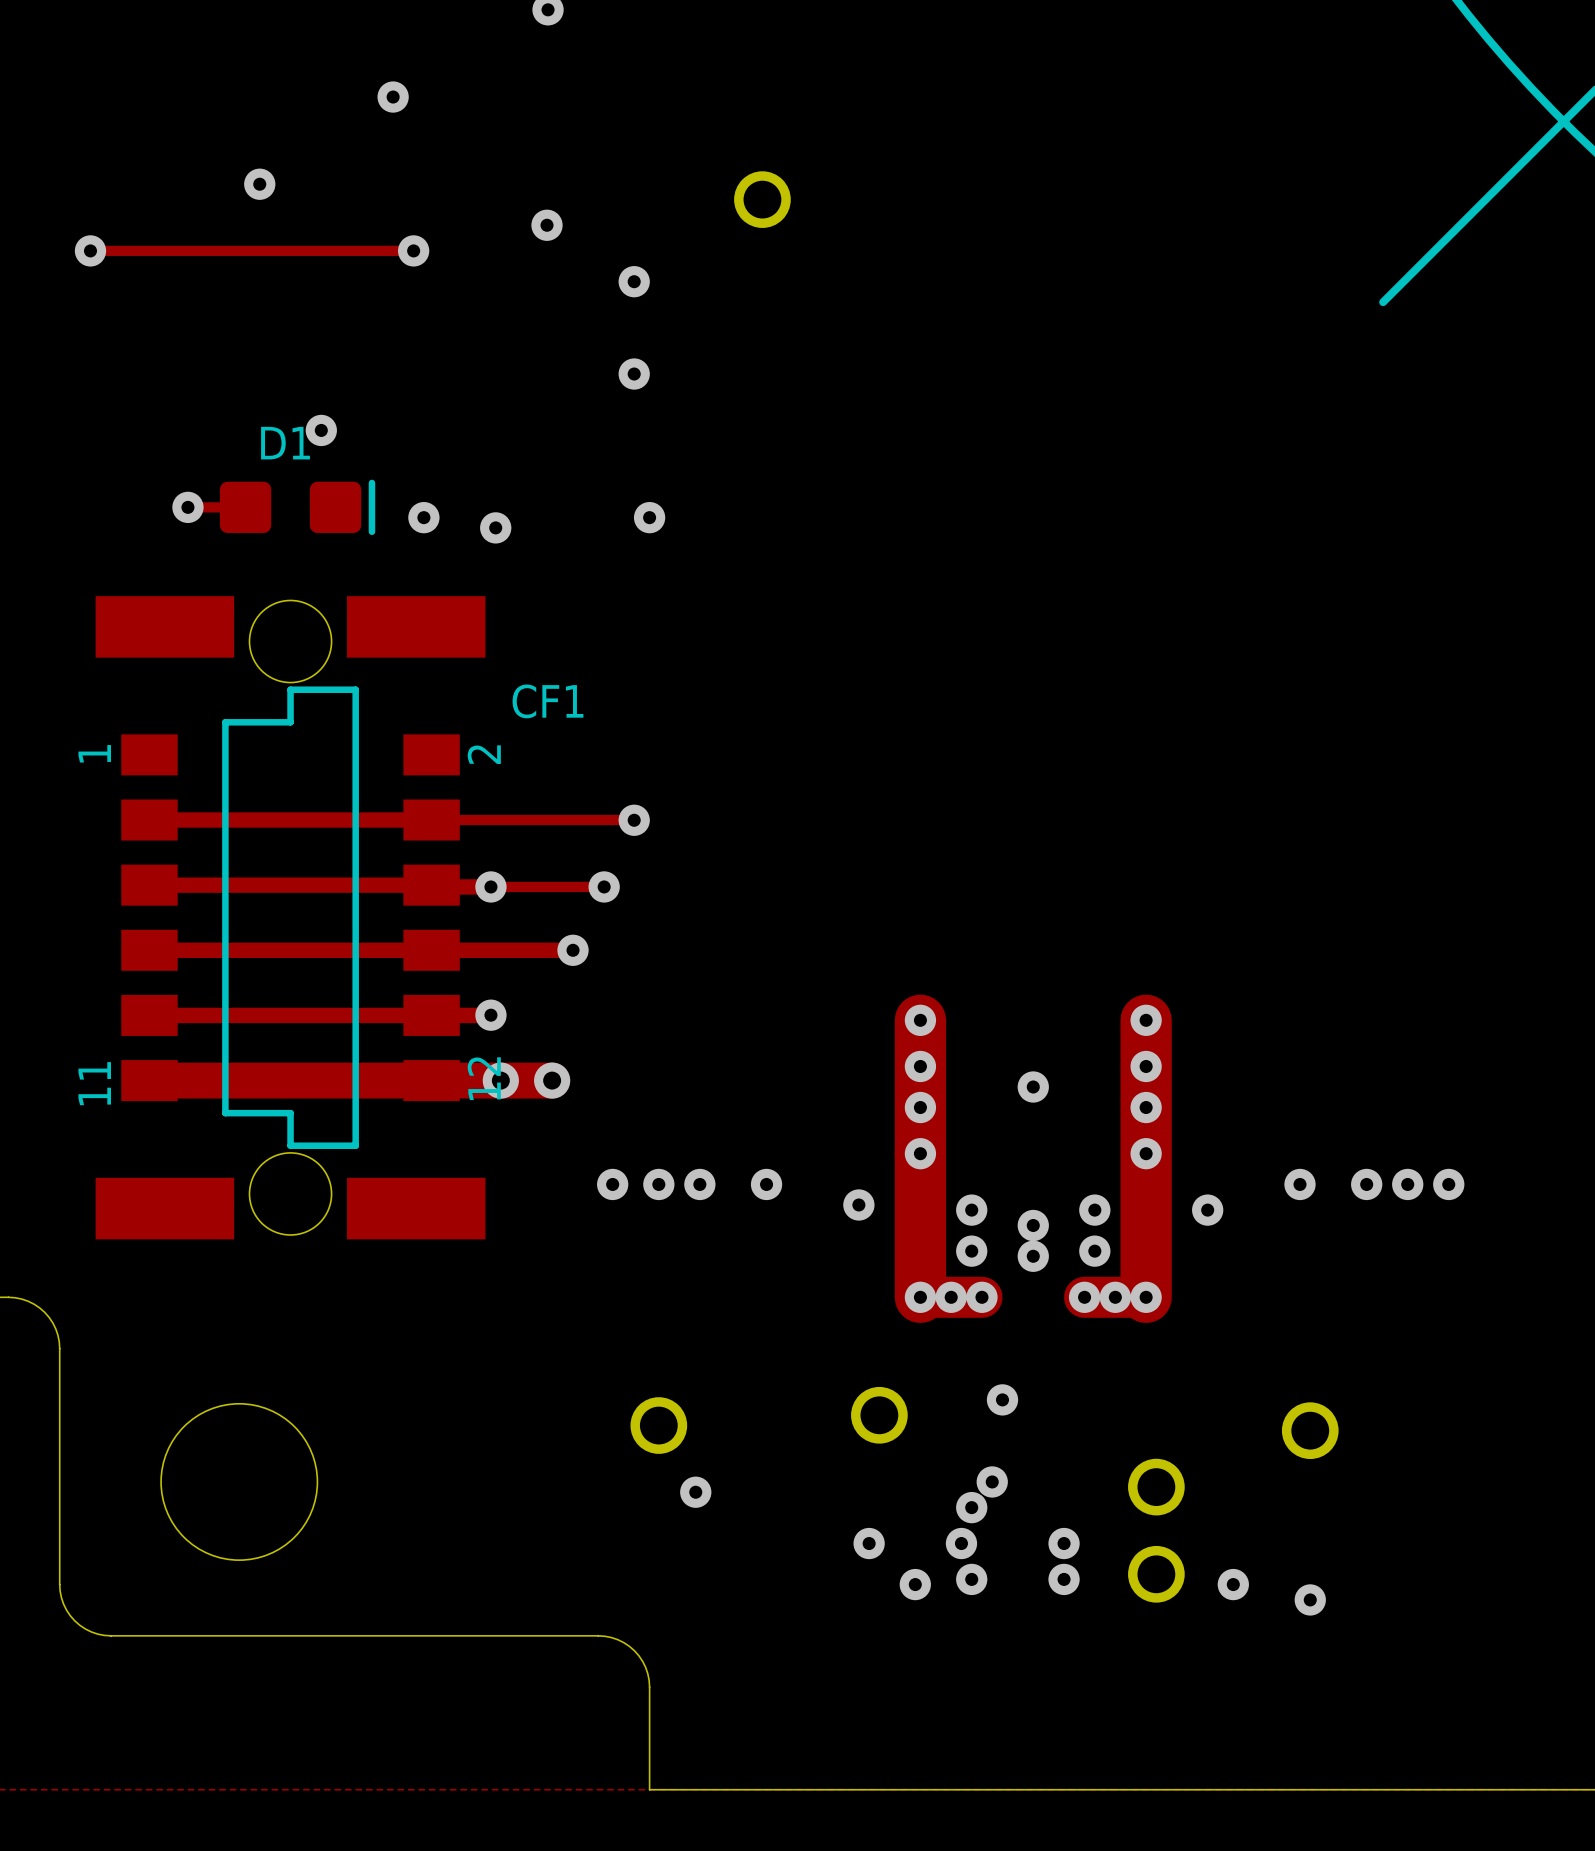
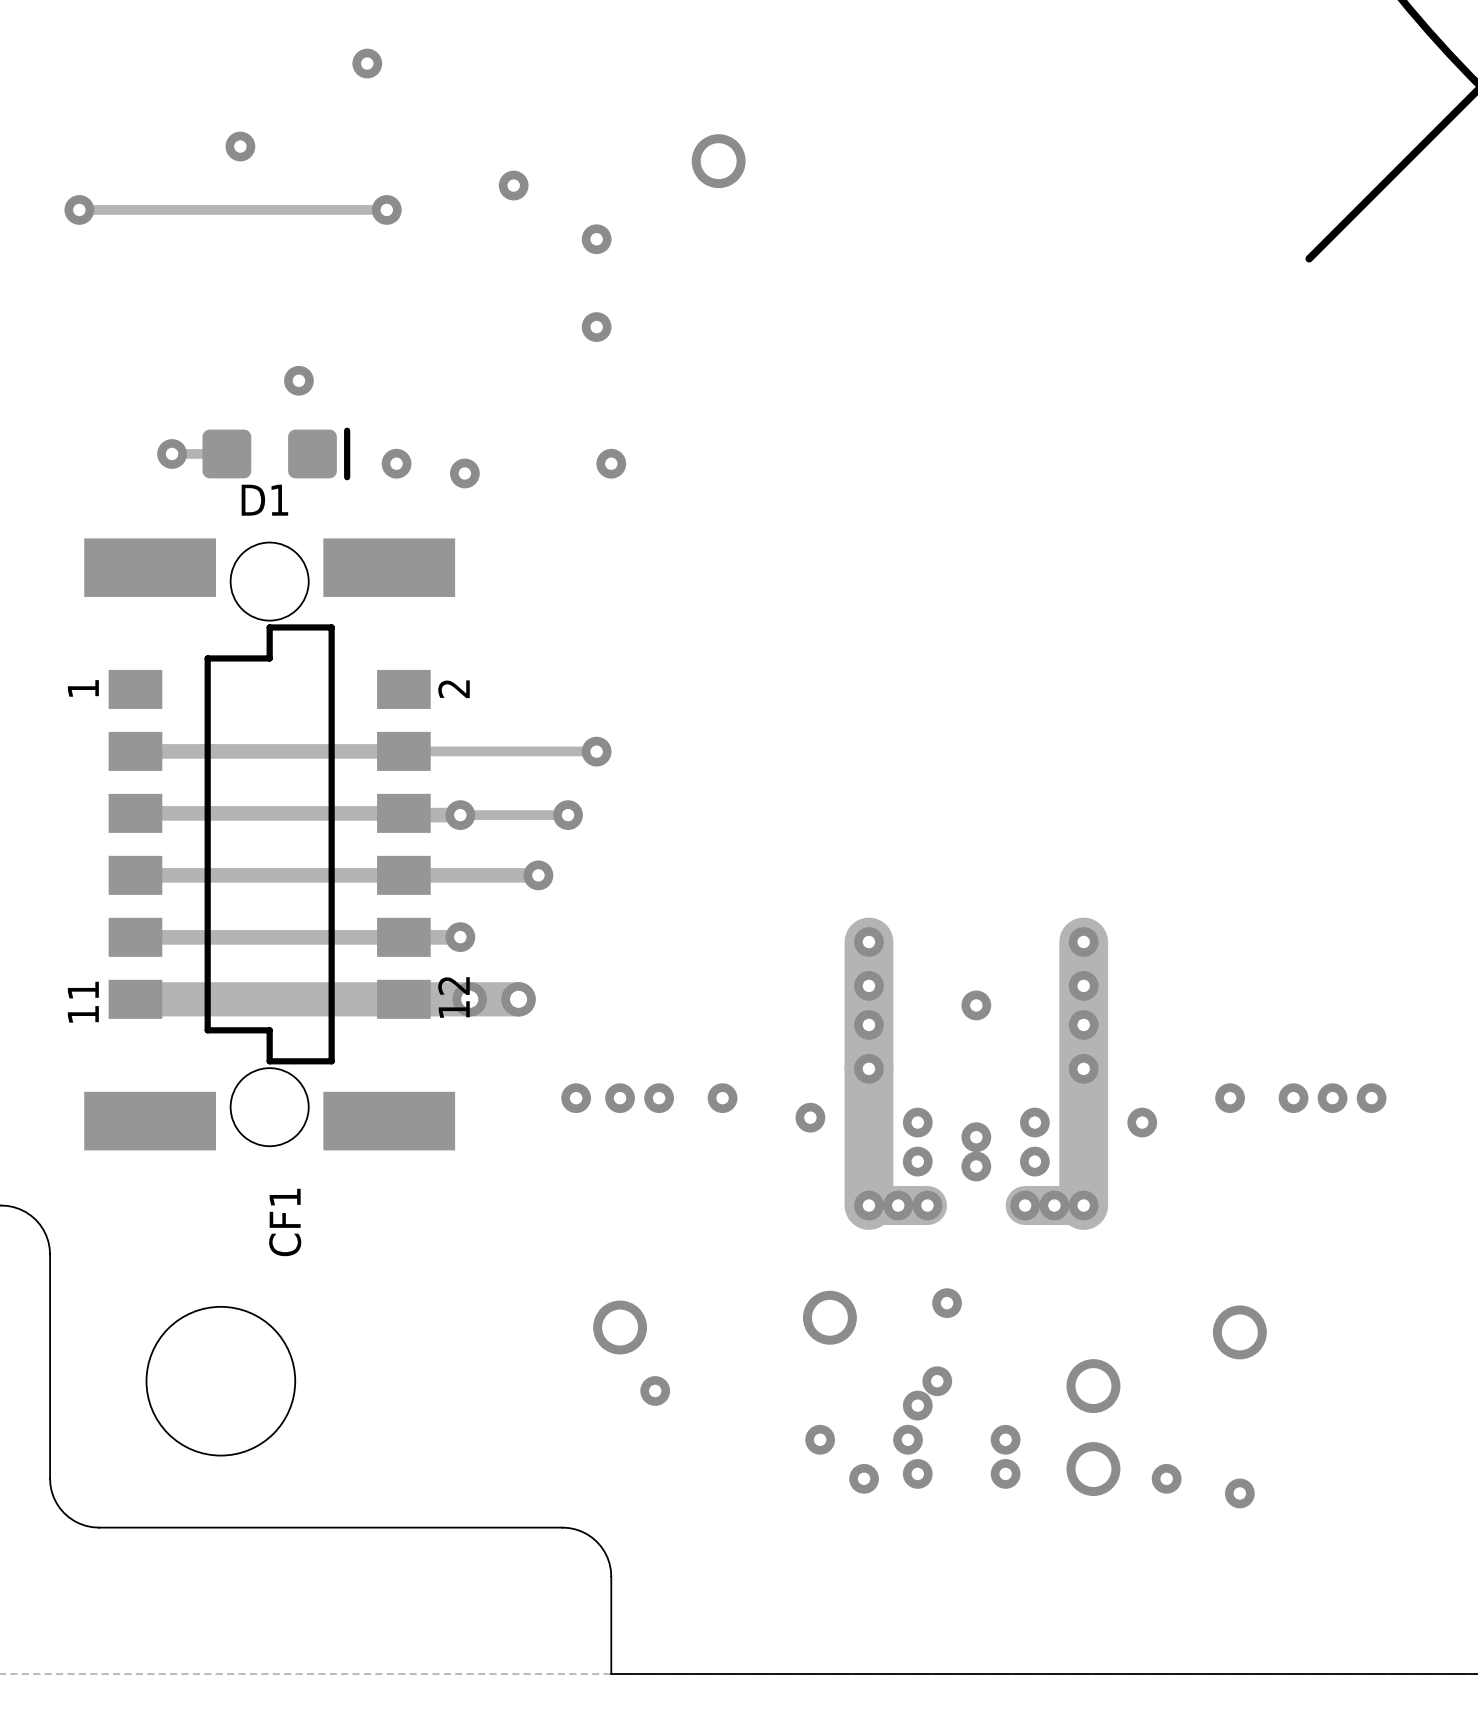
D1 name position: D1 (285, 443) -> D1 (264, 500)
CF1 name rotation: 0° (548, 701) -> 90° counterclockwise (285, 1222)
CF1 name position: CF1 (548, 701) -> CF1 (285, 1222)

